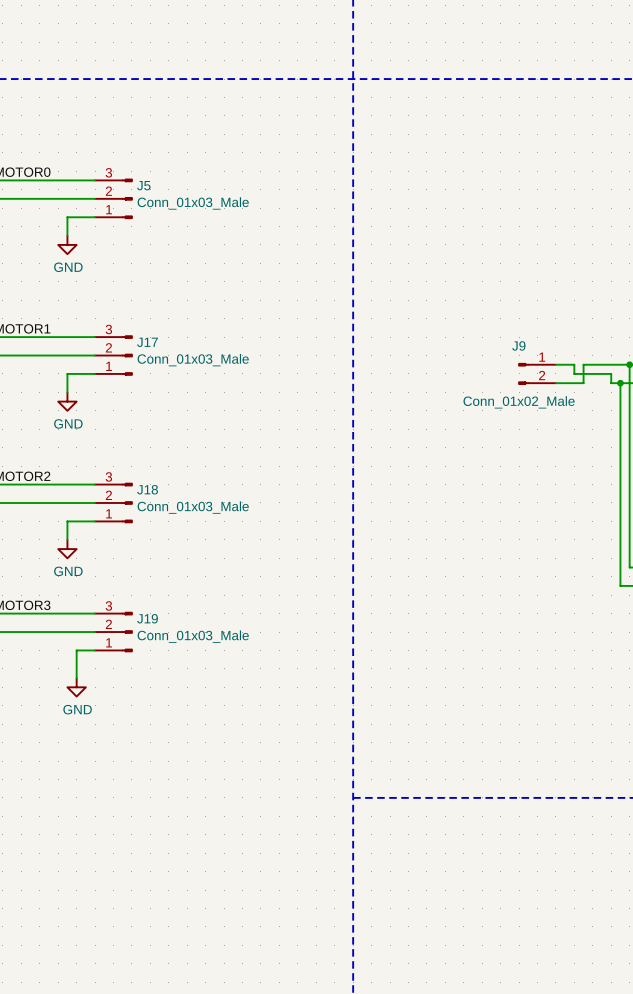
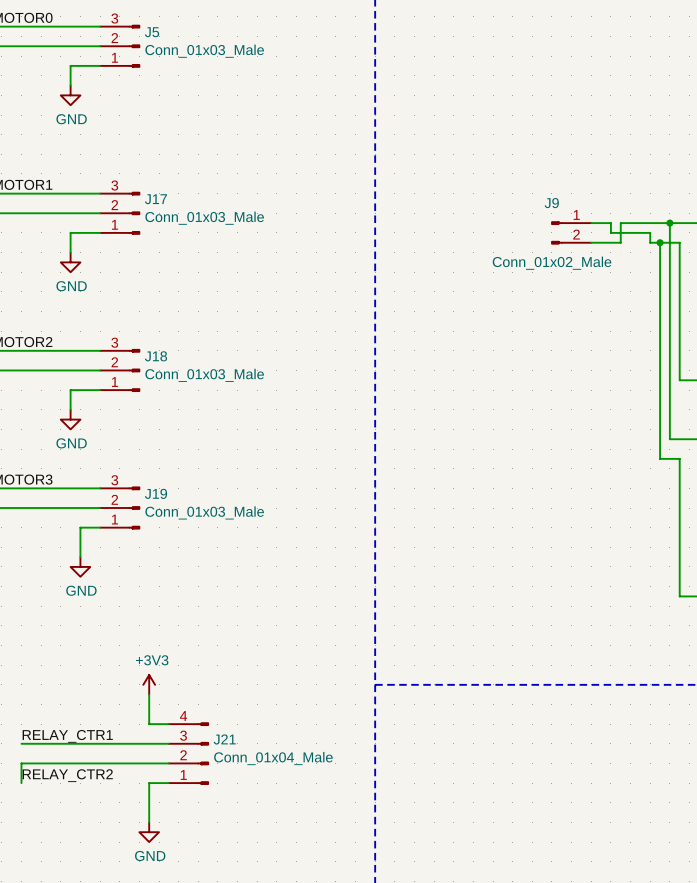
power symbol: none -> +3V3 (149, 684)
wire: none -> (149, 694) (149, 724) (168, 724)
label: none -> RELAY_CTR1 (67, 736)
wire: none -> (21, 743) (168, 743)
J21: none -> Conn_01x04_Male (188, 753)
wire: none -> (168, 763) (21, 763) (21, 783)
label: none -> RELAY_CTR2 (67, 775)
wire: none -> (168, 783) (149, 783) (149, 822)
power symbol: none -> GND (149, 832)

